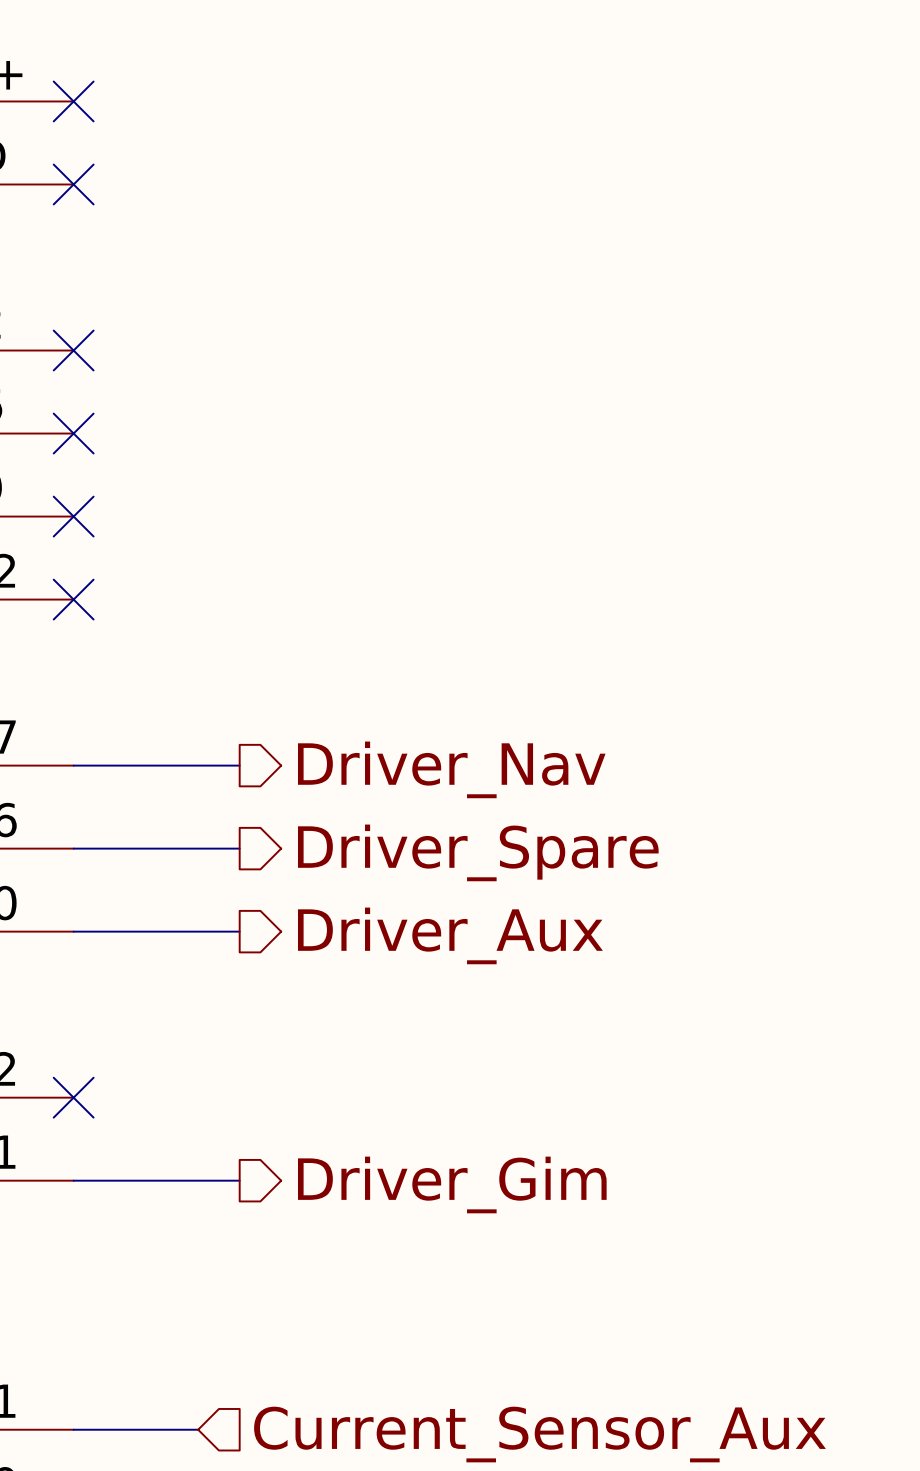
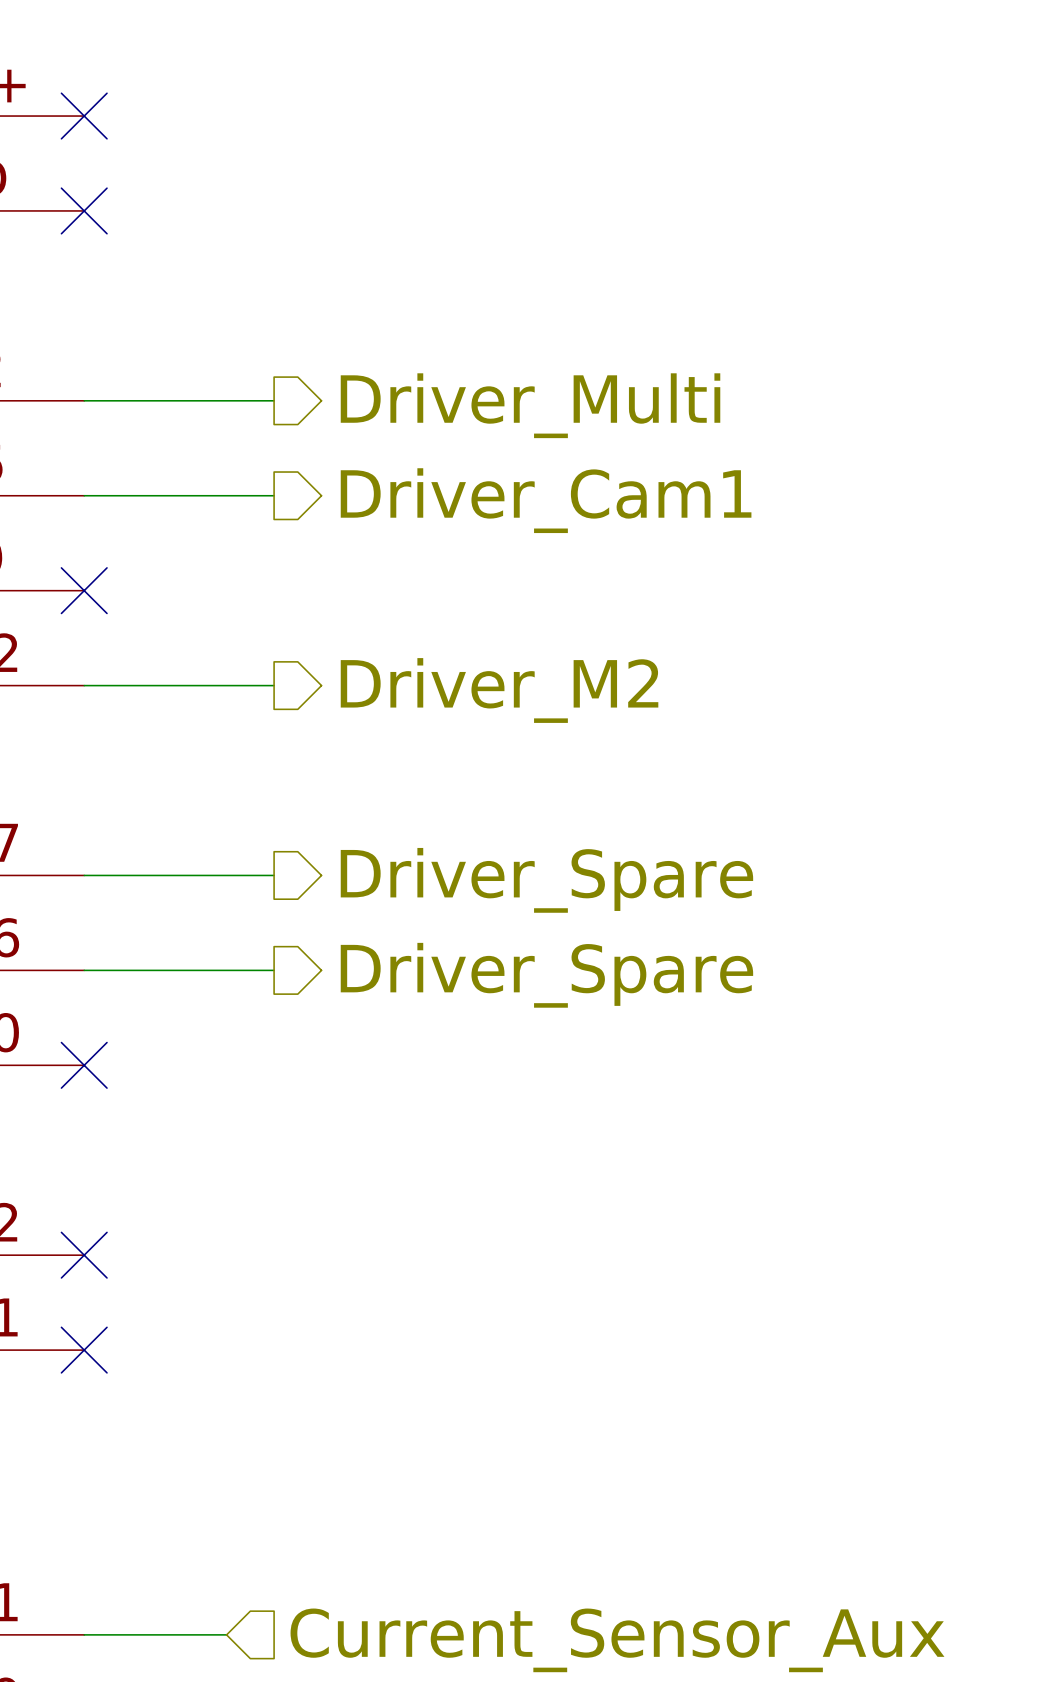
no-connect mark: (73, 350) -> none
hierarchical label: none -> Driver_Multi (530, 405)
wire: none -> (84, 495) (274, 495)
no-connect mark: (73, 433) -> none
hierarchical label: none -> Driver_Cam1 (546, 500)
no-connect mark: (73, 599) -> none
hierarchical label: none -> Driver_M2 (499, 690)
hierarchical label: Driver_Nav (451, 769) -> Driver_Spare (546, 880)
wire: (73, 931) (239, 931) -> (84, 400) (274, 400)
no-connect mark: none -> (84, 1065)
hierarchical label: Driver_Aux (450, 935) -> none
wire: (73, 1180) (239, 1180) -> (84, 685) (274, 685)
no-connect mark: none -> (84, 1350)
hierarchical label: Driver_Gim (452, 1184) -> none

